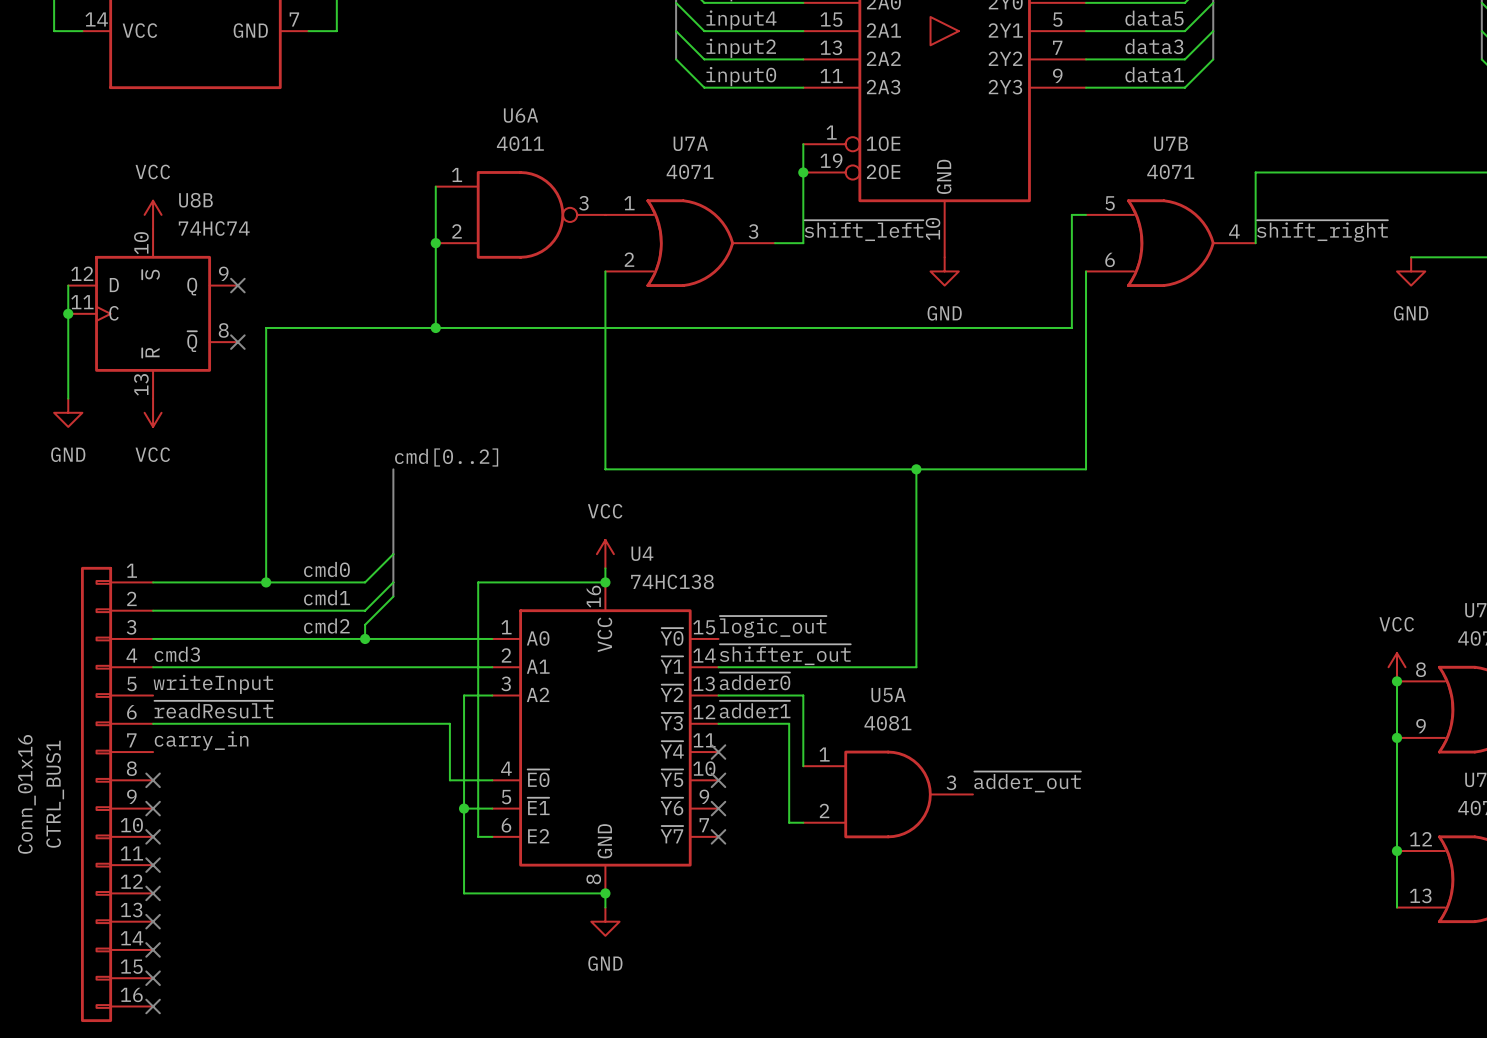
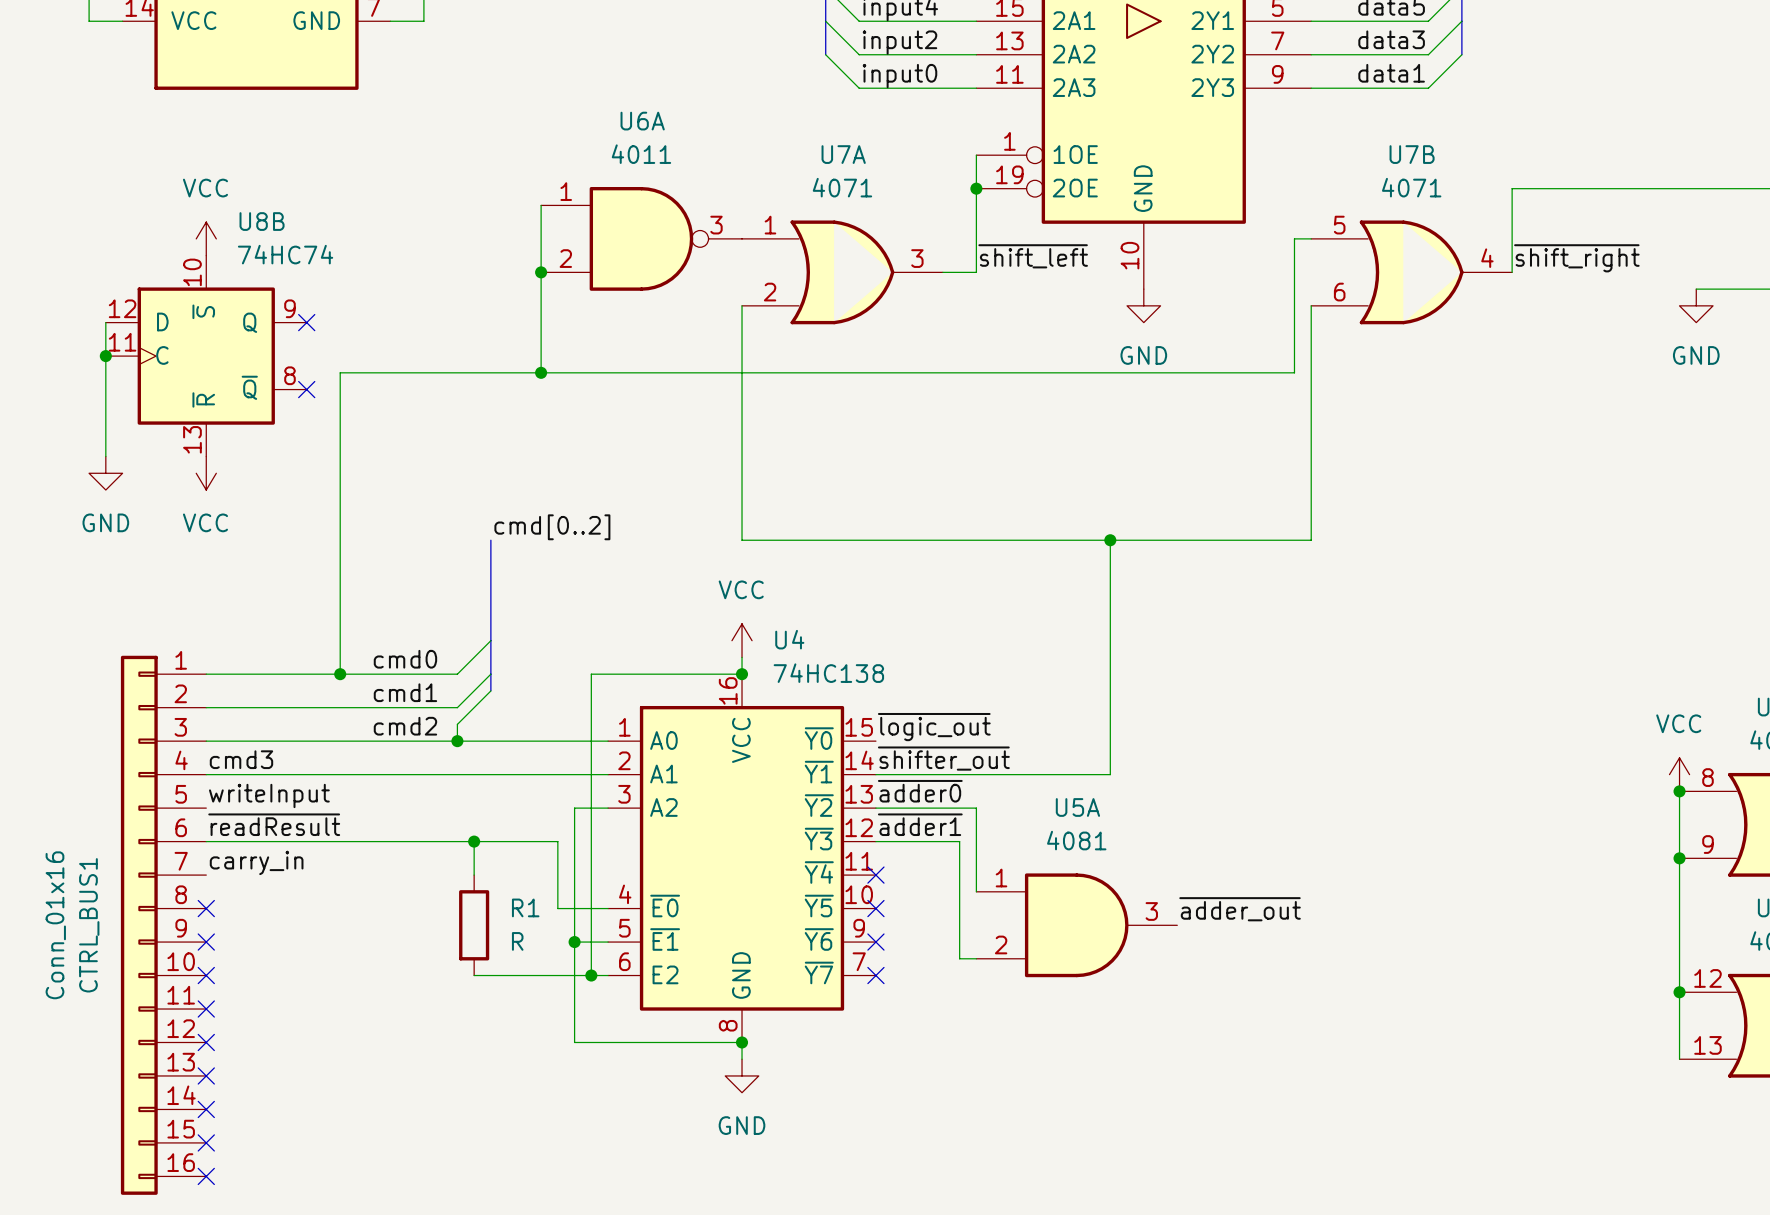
wire: none -> (474, 841) (474, 875)
junction: none -> (474, 841)
R1: none -> R (474, 925)
wire: none -> (474, 975) (591, 975)
junction: none -> (591, 975)

